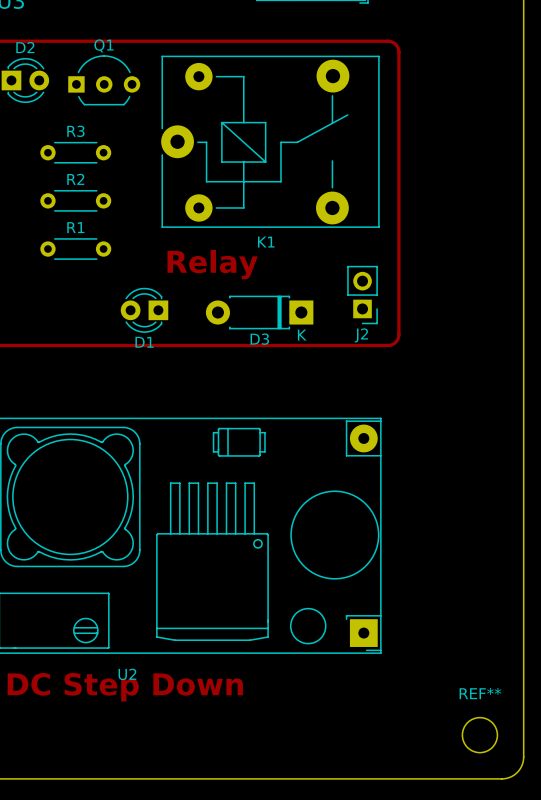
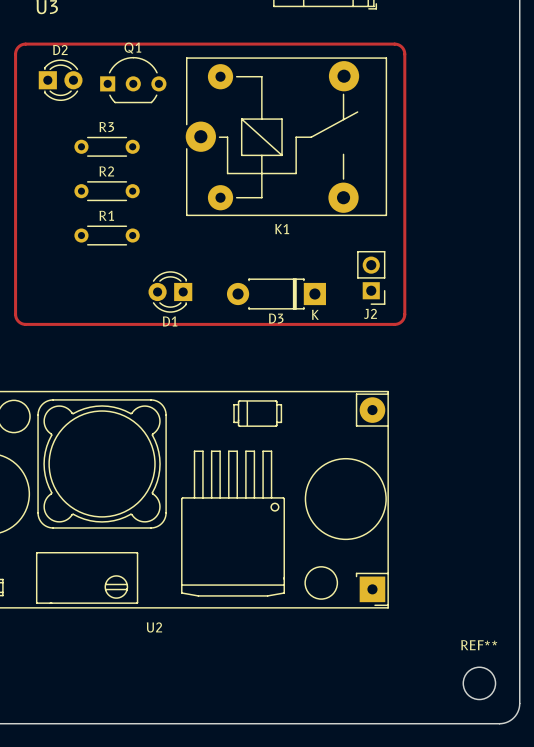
text: Relay (212, 264) -> none
text: DC Step Down (125, 687) -> none

